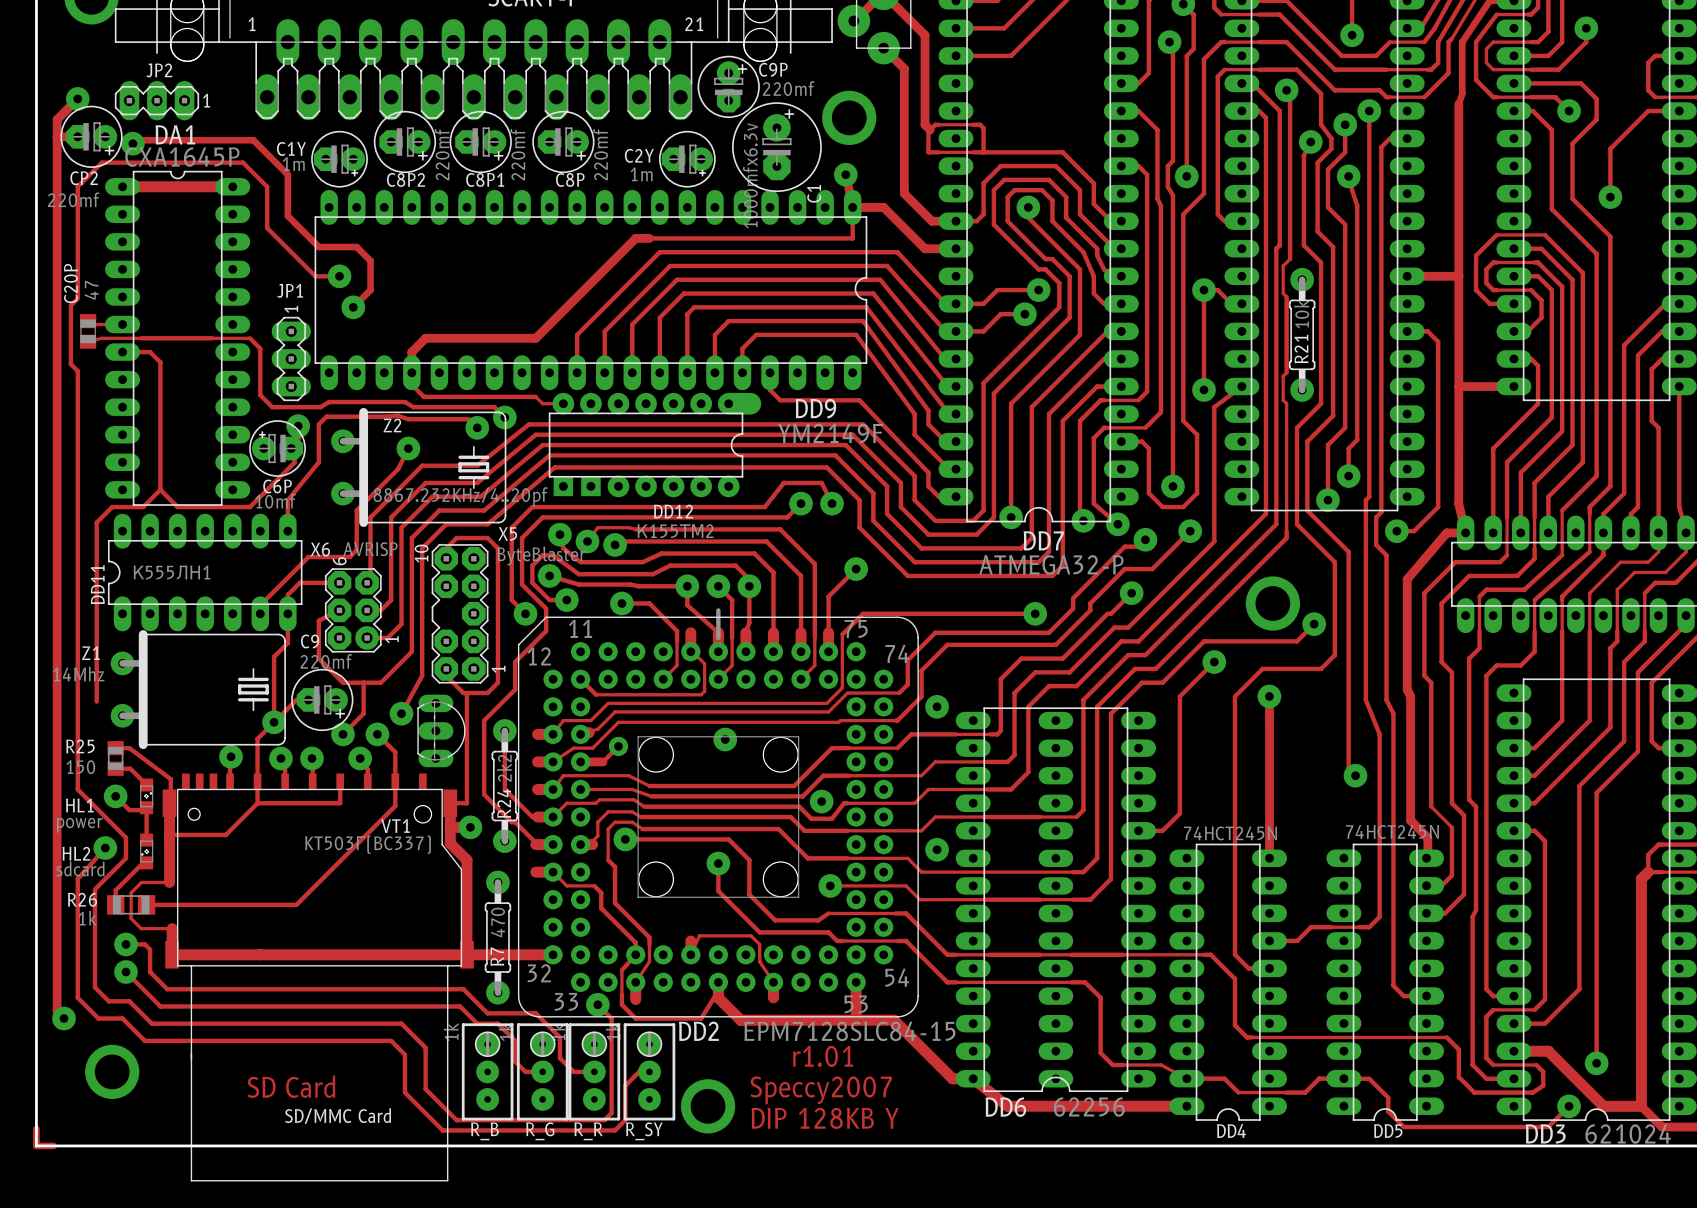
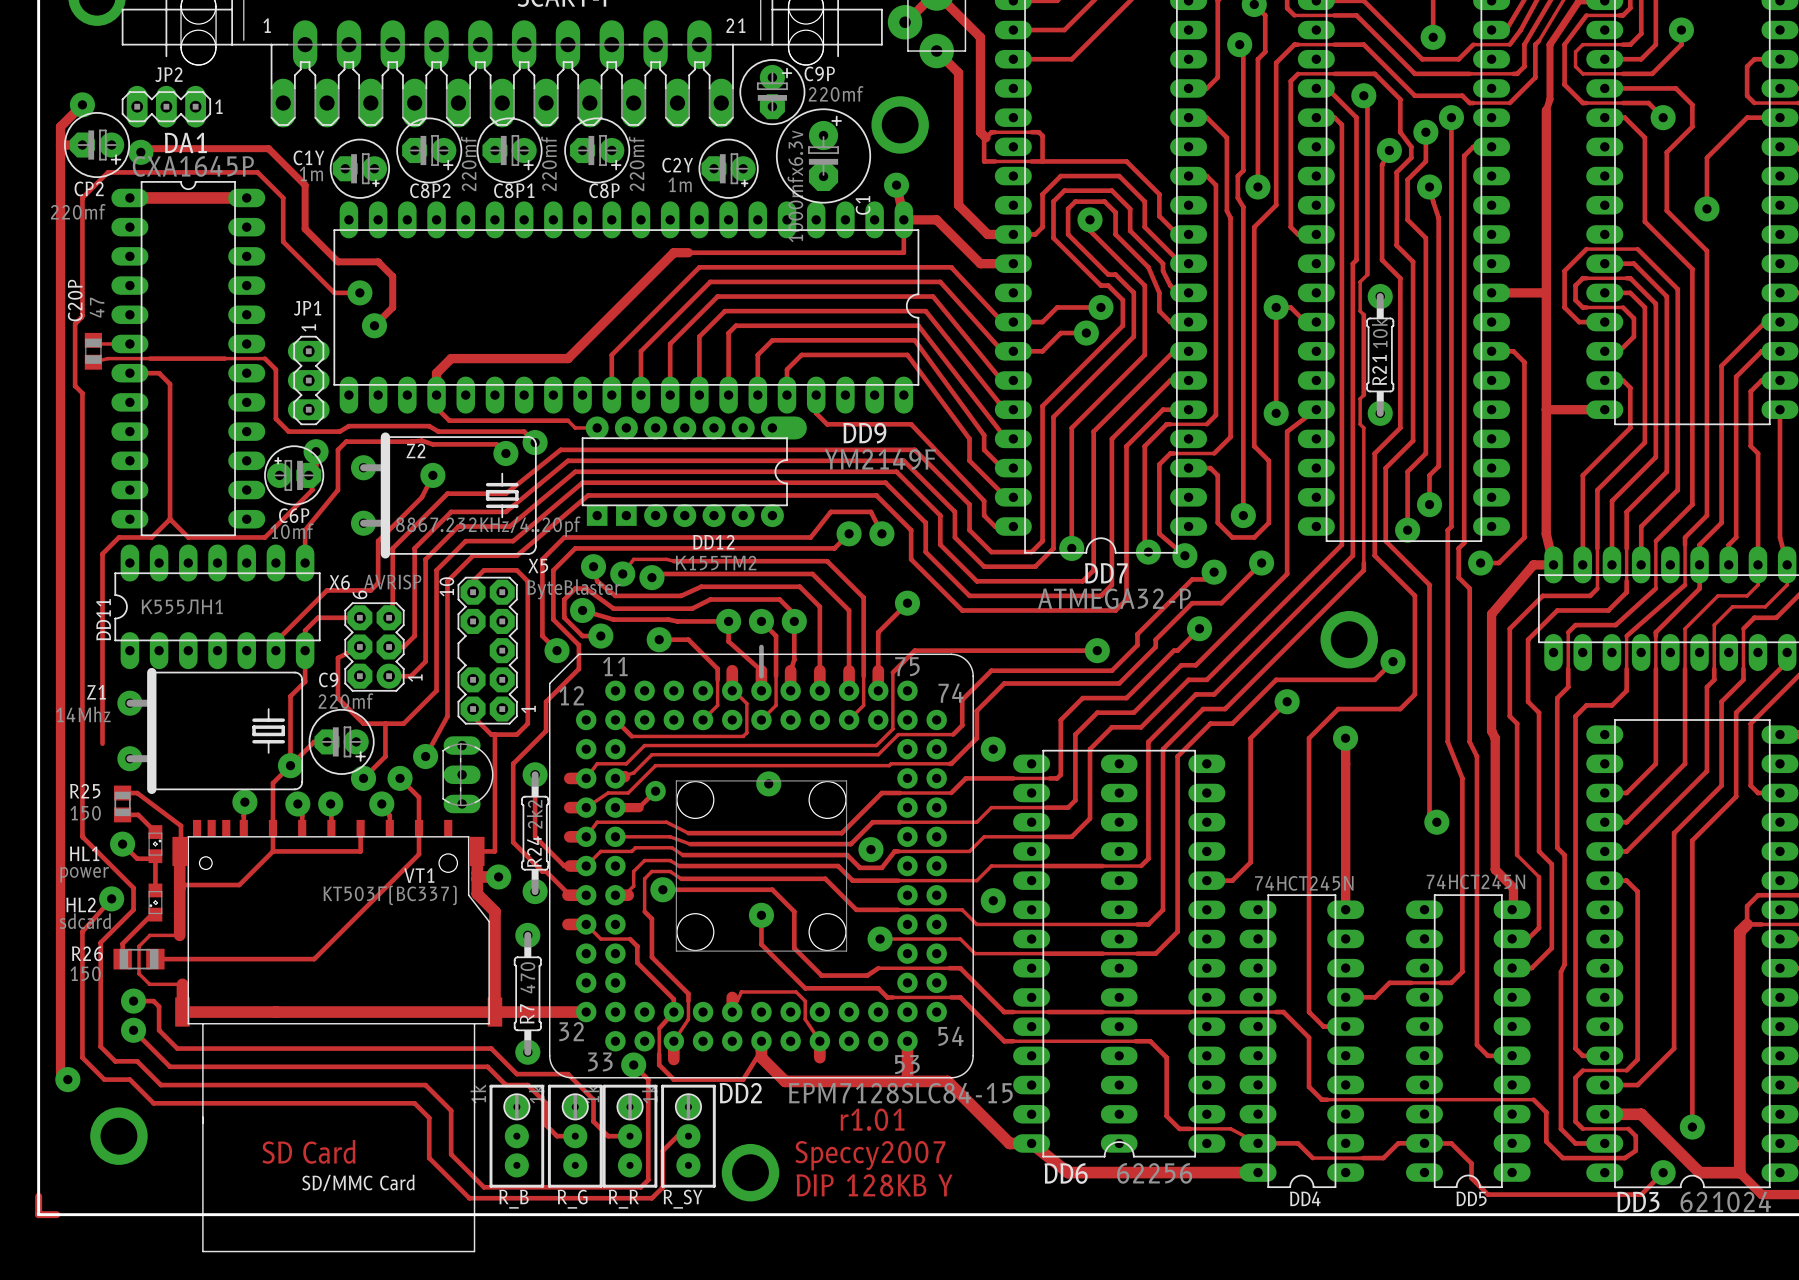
R26 value: 1k (87, 918) -> 150 (85, 973)

